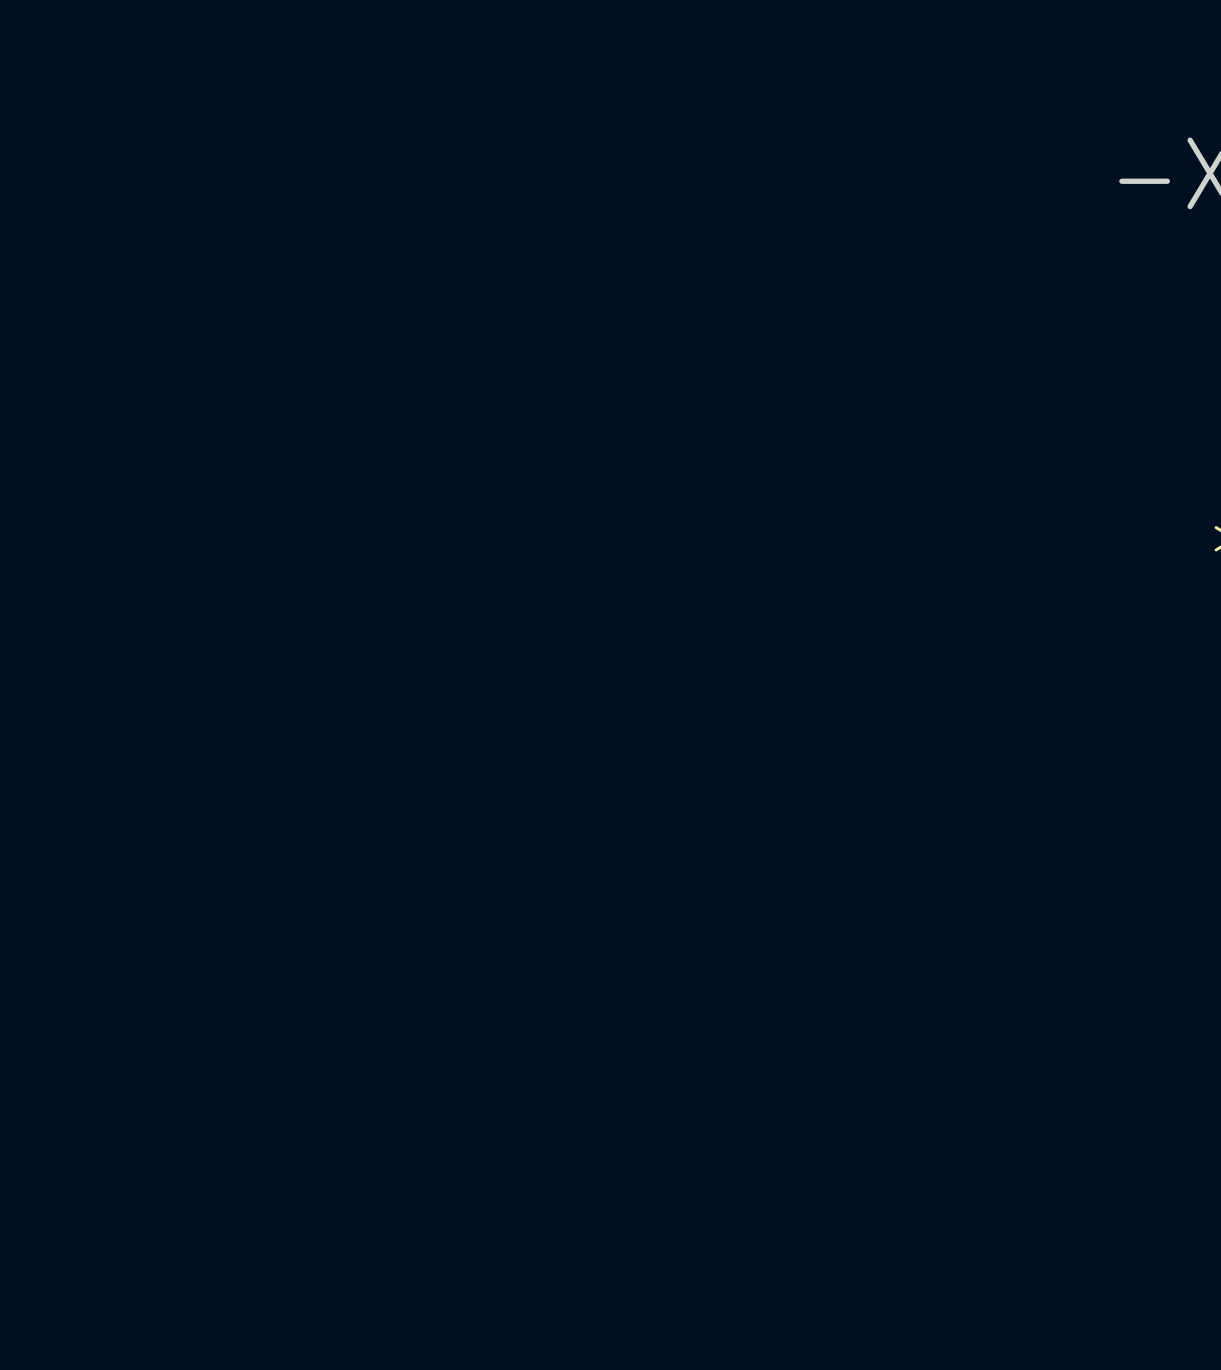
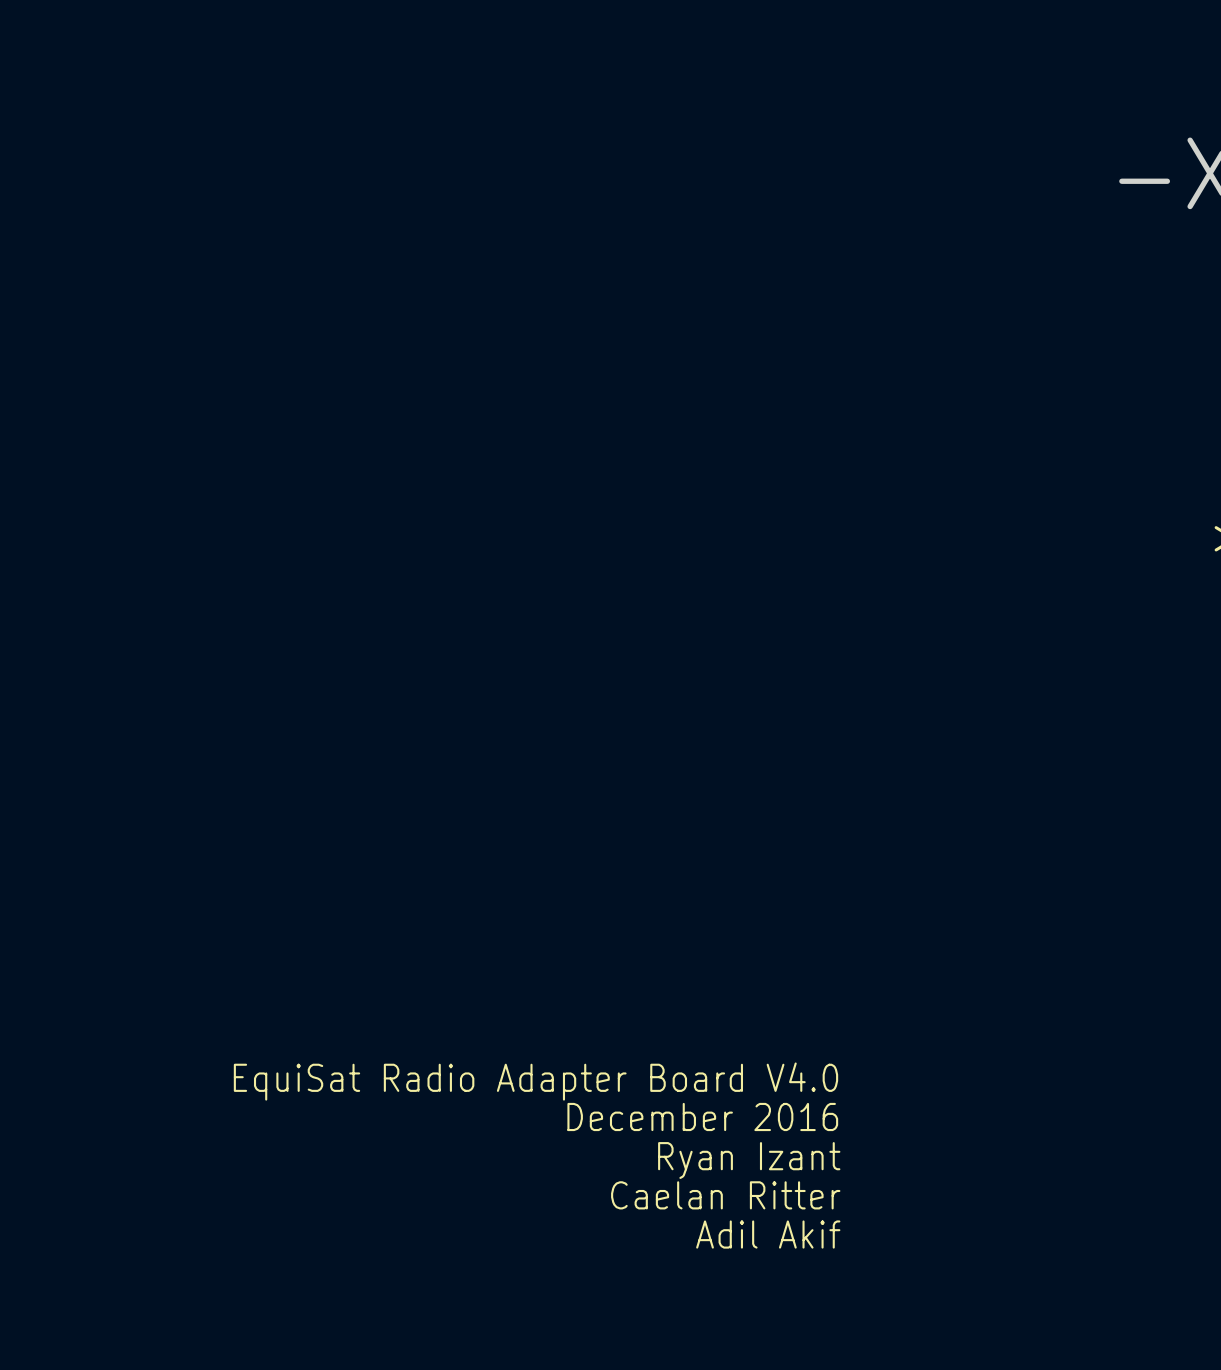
text: none -> EquiSat Radio Adapter Board V4.0 (535, 1081)
text: none -> December 2016 (702, 1116)
text: none -> Ryan Izant (749, 1160)
text: none -> Caelan Ritter (725, 1195)
text: none -> Adil Akif (768, 1234)

